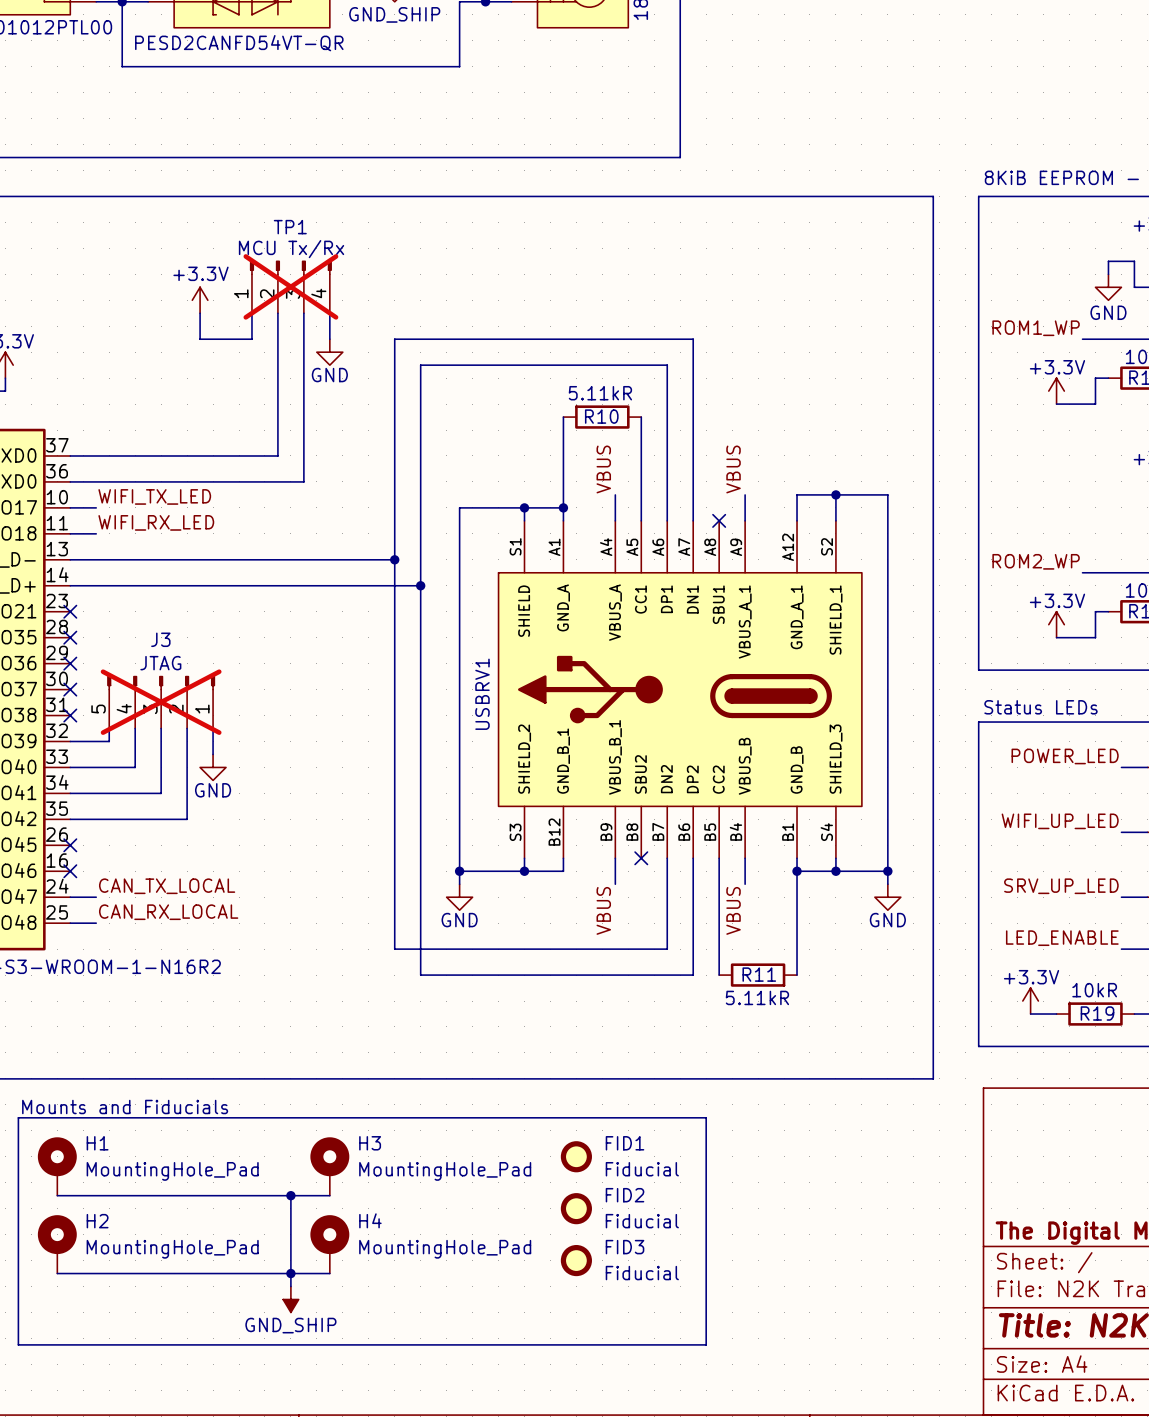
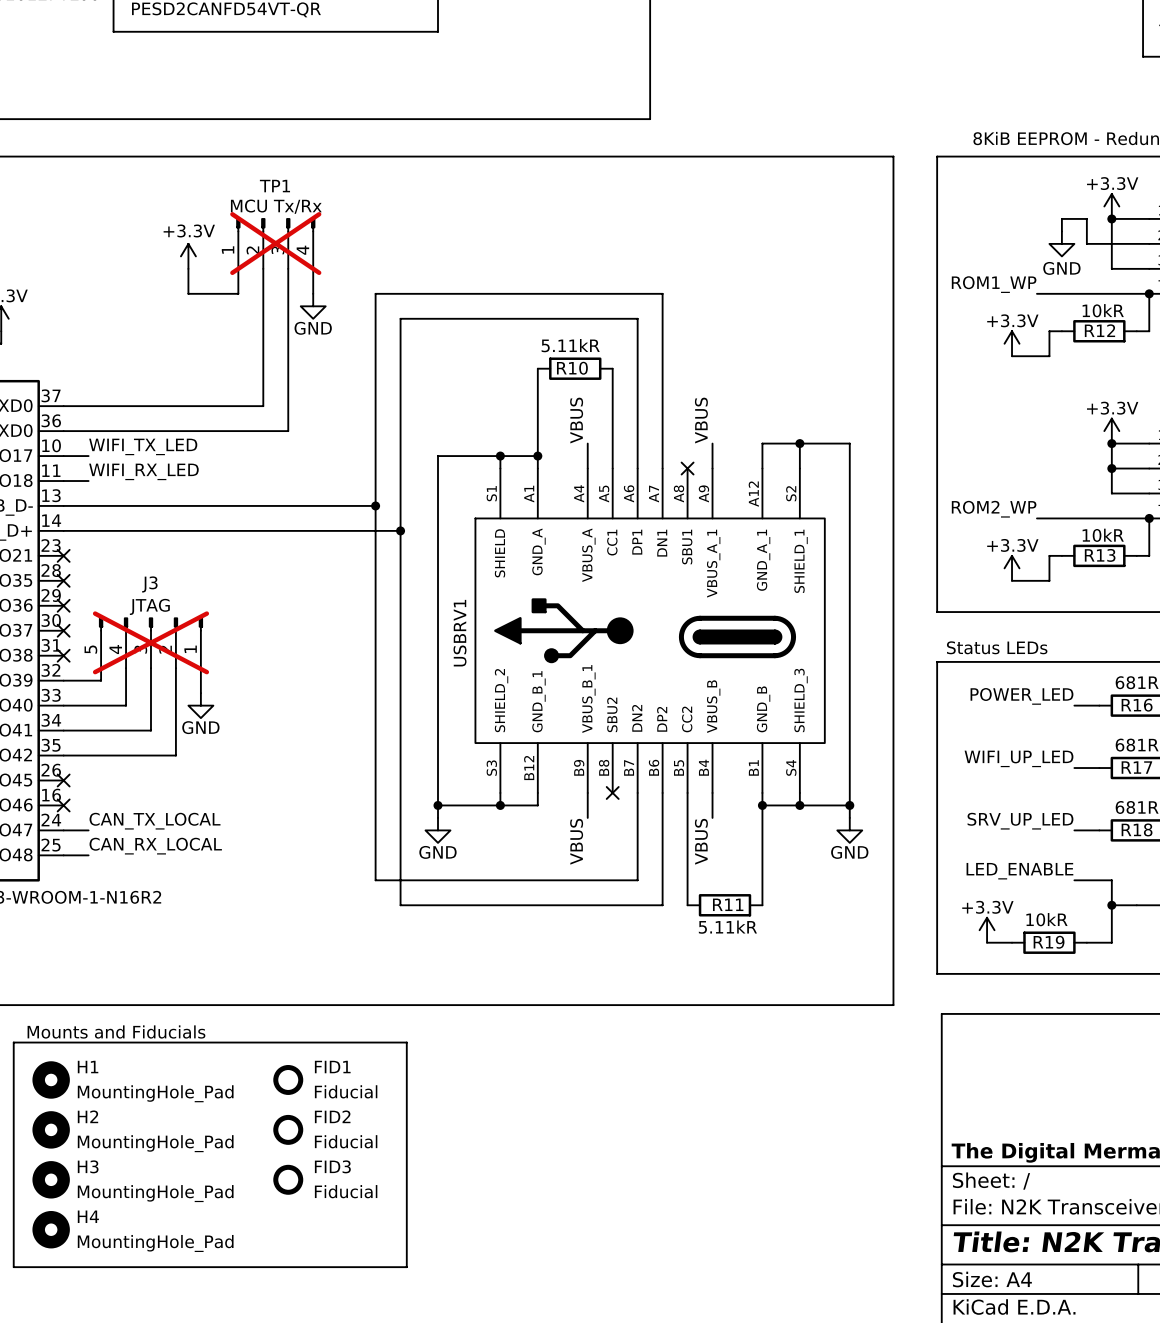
line: (427, 1117) (706, 1117) (706, 1344) (18, 1344) -> (406, 1042) (406, 1267) (13, 1267) (13, 1260)
H1 symbol: [37, 1137, 77, 1196] -> [32, 1061, 70, 1099]
H3 symbol: [310, 1137, 350, 1196] -> [32, 1161, 70, 1199]
FID1 position: (576, 1156) -> (288, 1079)
wire: (57, 1195) (329, 1195) -> none
wire: (290, 1195) (290, 1286) -> none
junction: (290, 1195) -> none
FID2 position: (576, 1208) -> (288, 1129)
H2 symbol: [37, 1215, 77, 1274] -> [32, 1111, 70, 1149]
H4 symbol: [310, 1215, 350, 1274] -> [32, 1211, 70, 1249]
FID3 position: (576, 1260) -> (288, 1179)
wire: (57, 1273) (329, 1273) -> none
junction: (290, 1273) -> none
power symbol: GND_SHIP (290, 1299) -> none

